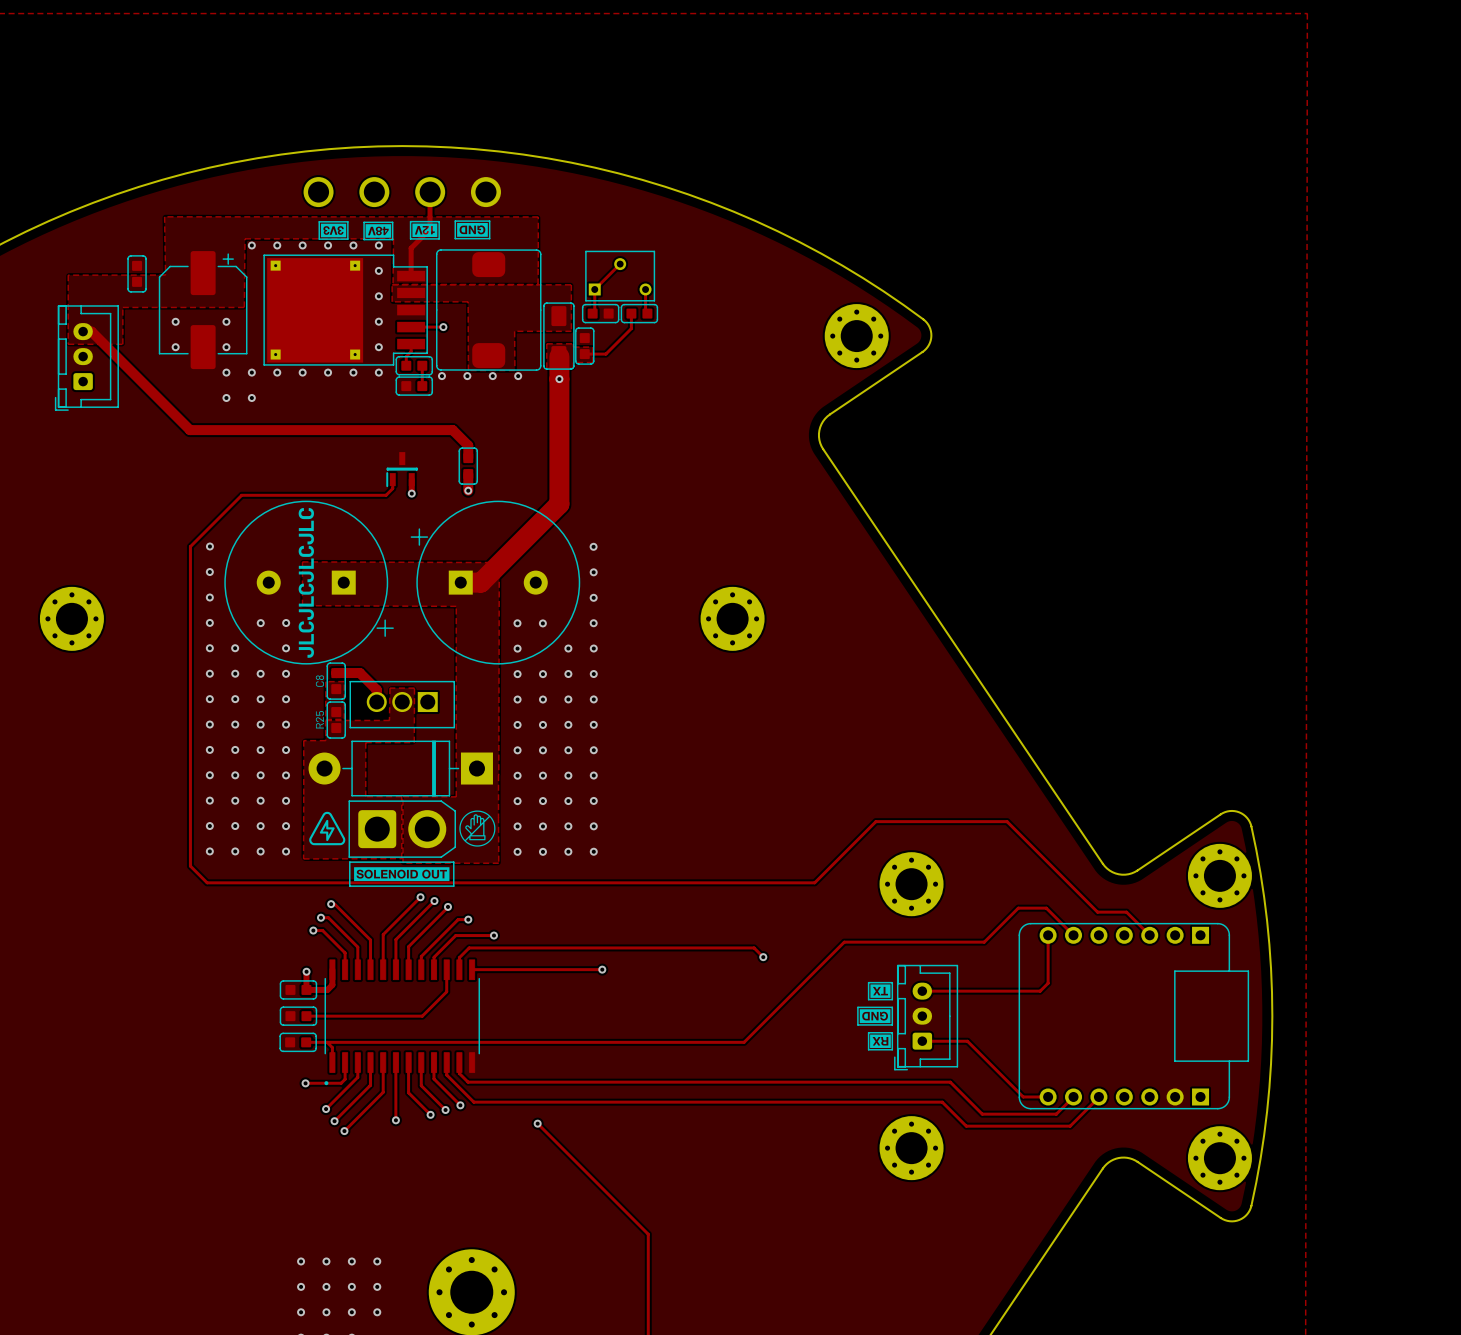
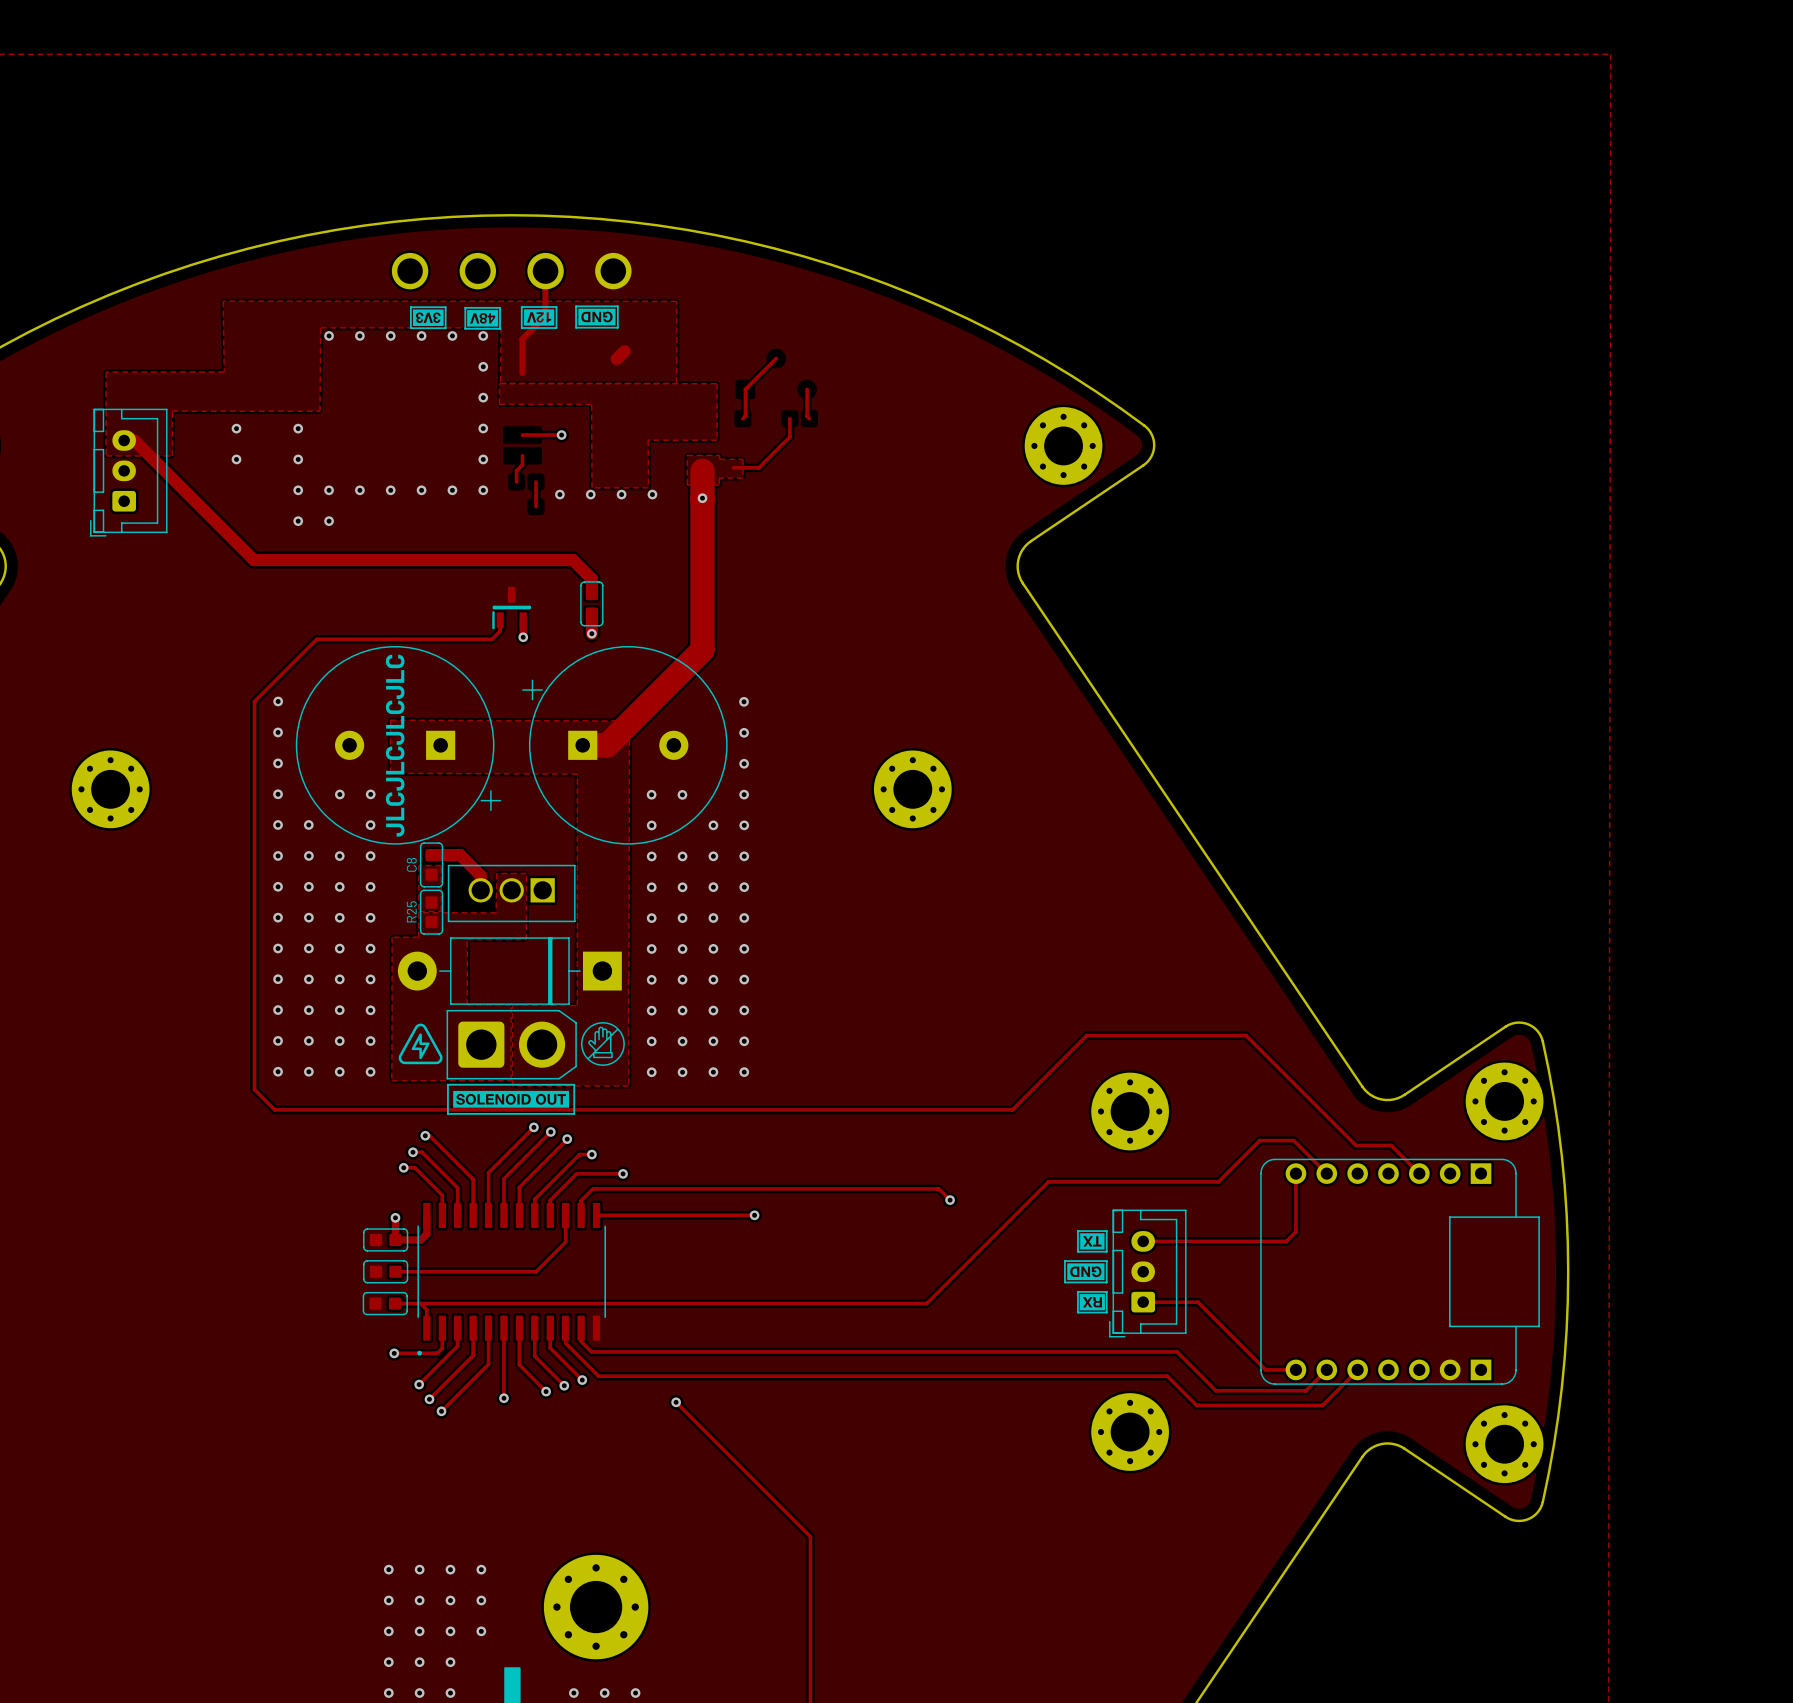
part: (137, 273) -> none
part: (620, 276) -> none
part: (203, 310) -> none
part: (345, 310) -> none
part: (488, 310) -> none
part: (600, 313) -> none
part: (639, 313) -> none
part: (558, 336) -> none
part: (584, 346) -> none
part: (414, 365) -> none
part: (414, 386) -> none

